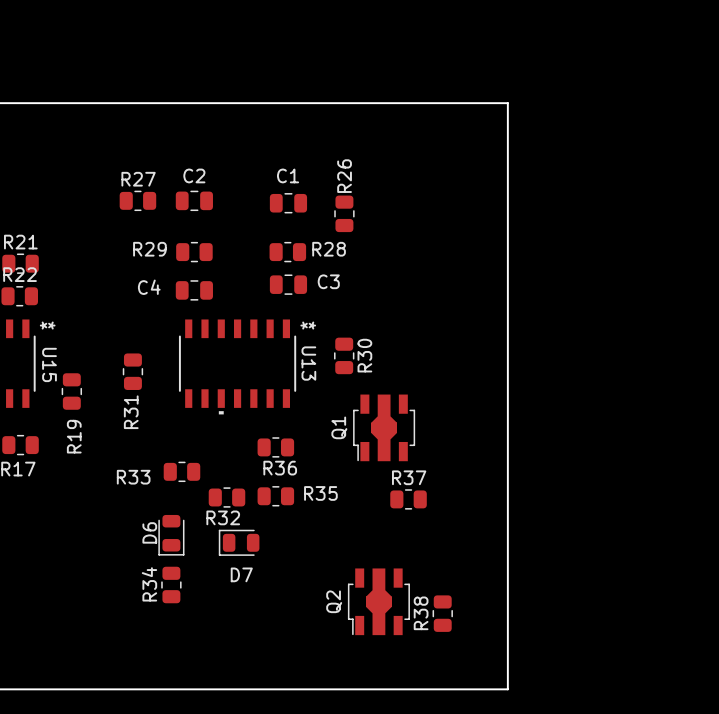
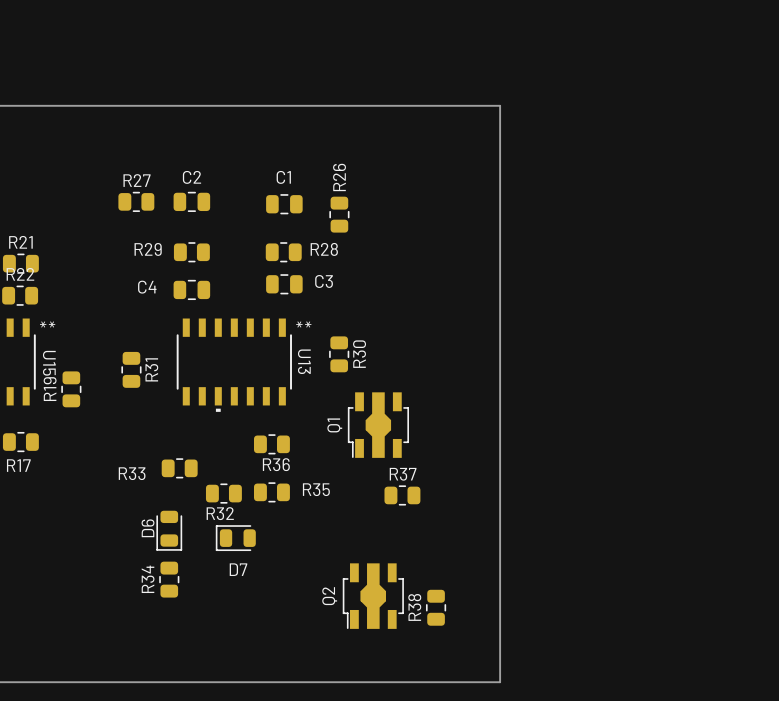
R31 name position: R31 (131, 412) -> R31 (151, 369)
R19 name position: R19 (74, 436) -> R19 (50, 389)

